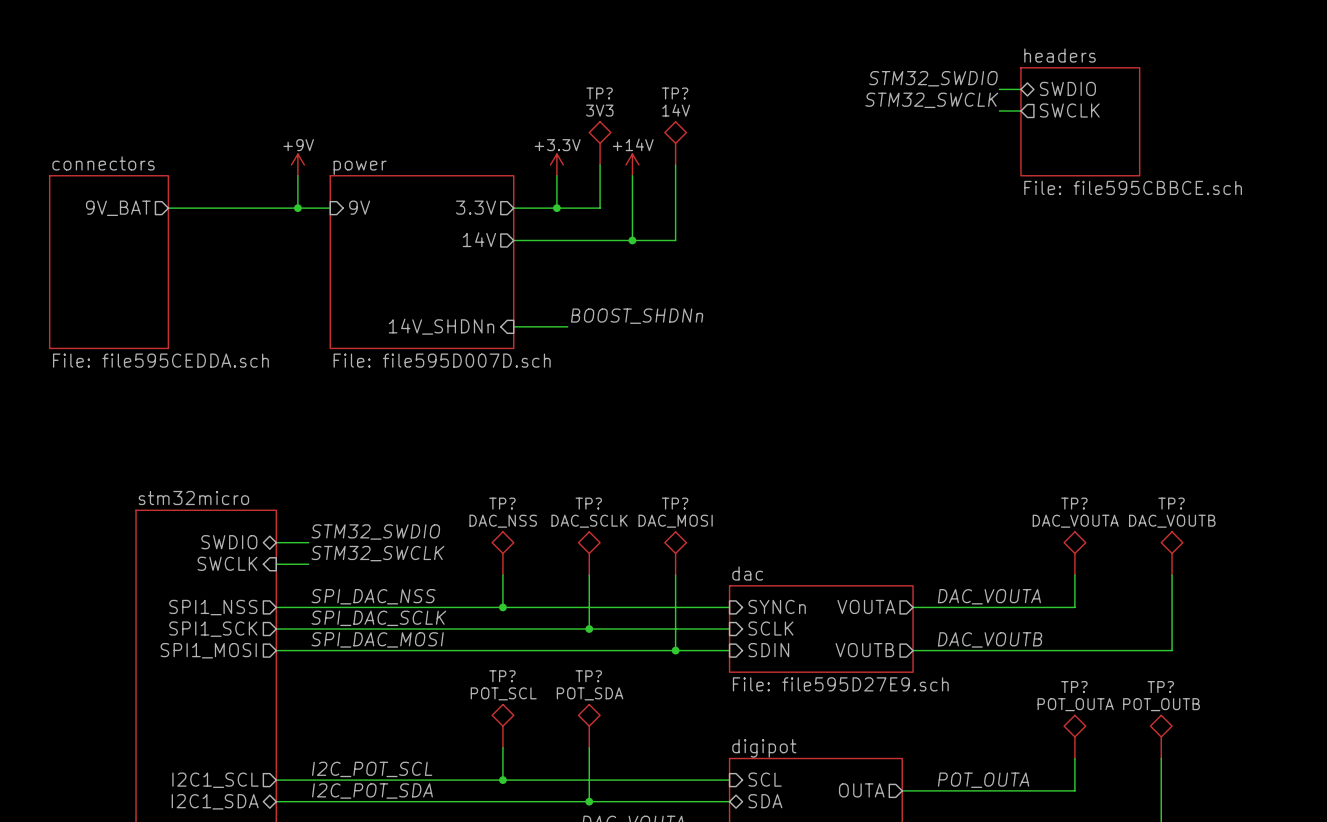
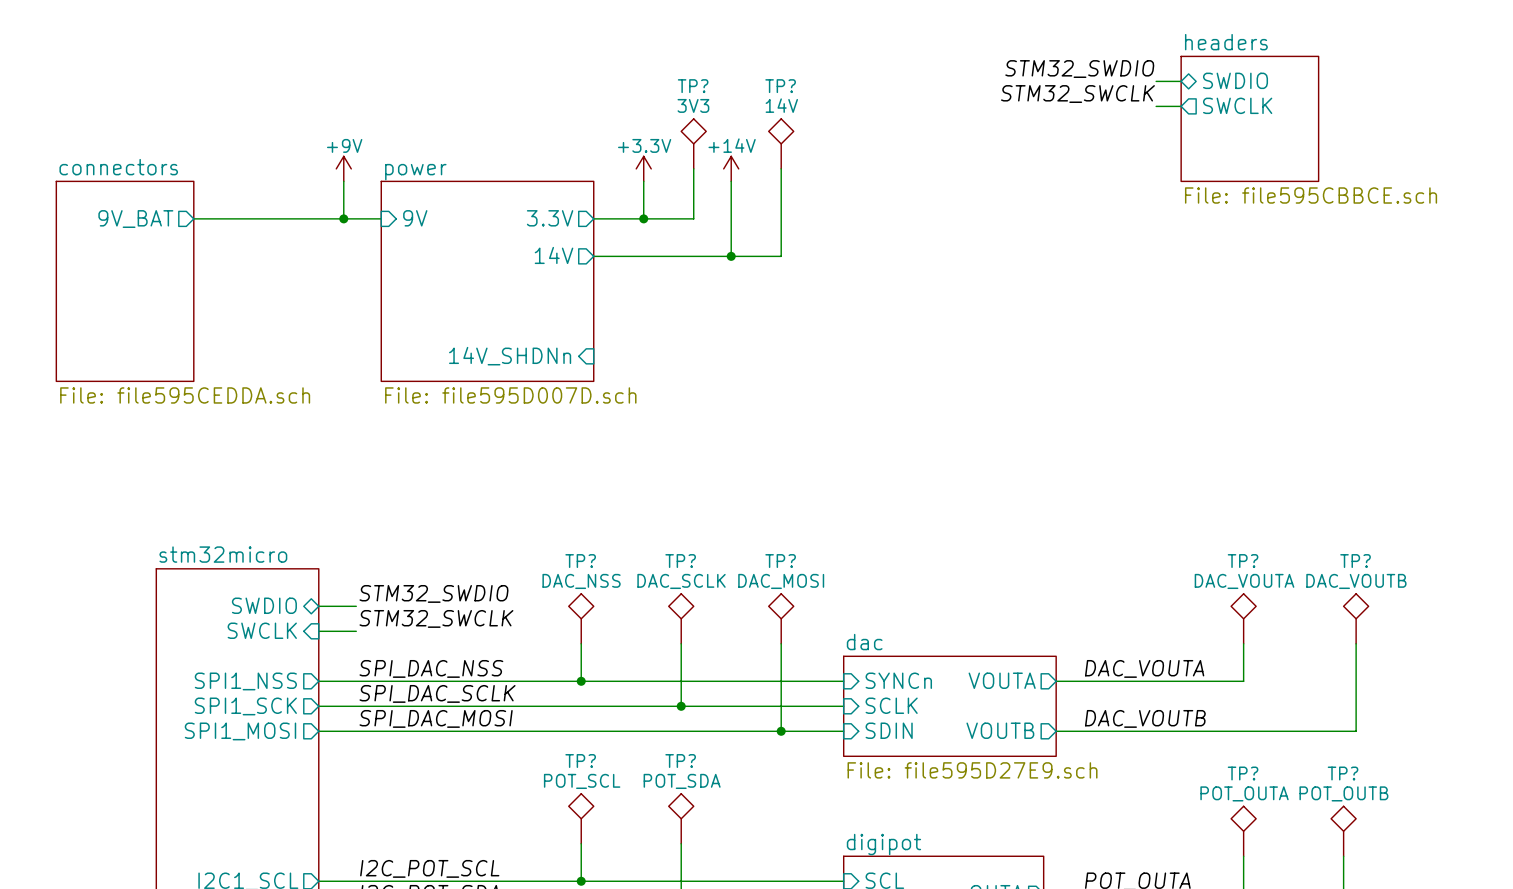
label: BOOST_SHDNn (637, 316) -> none
wire: (513, 326) (567, 326) -> none

